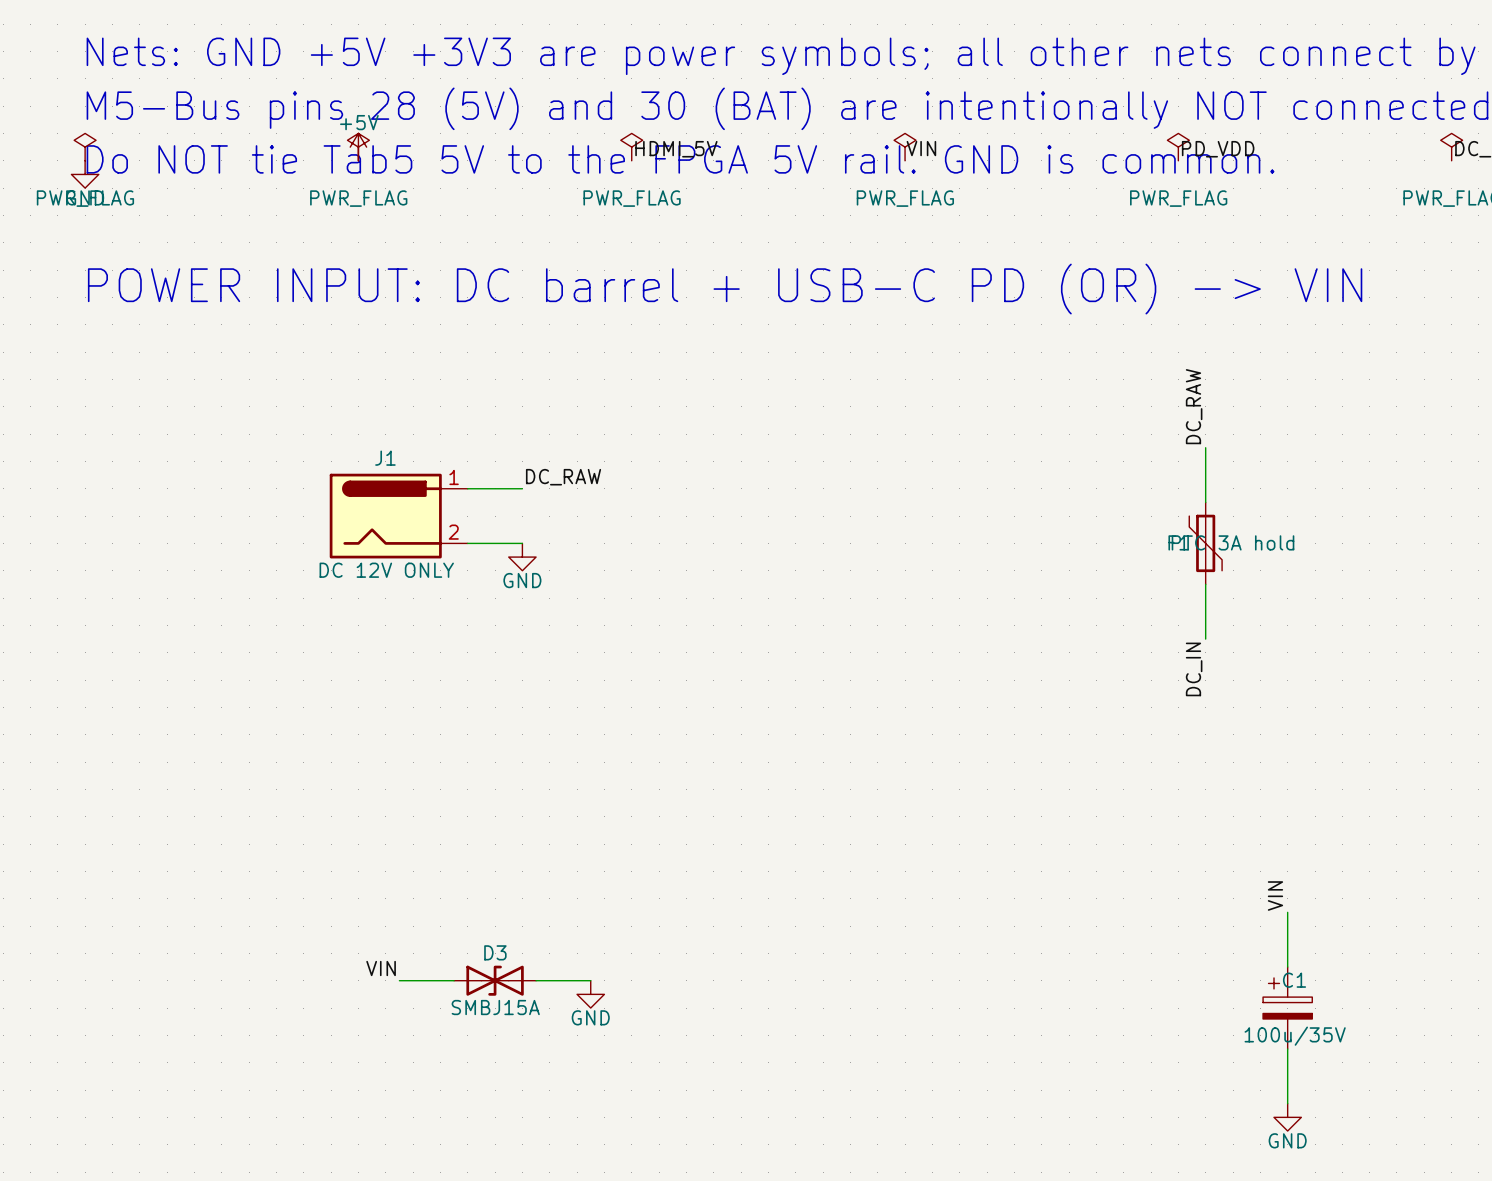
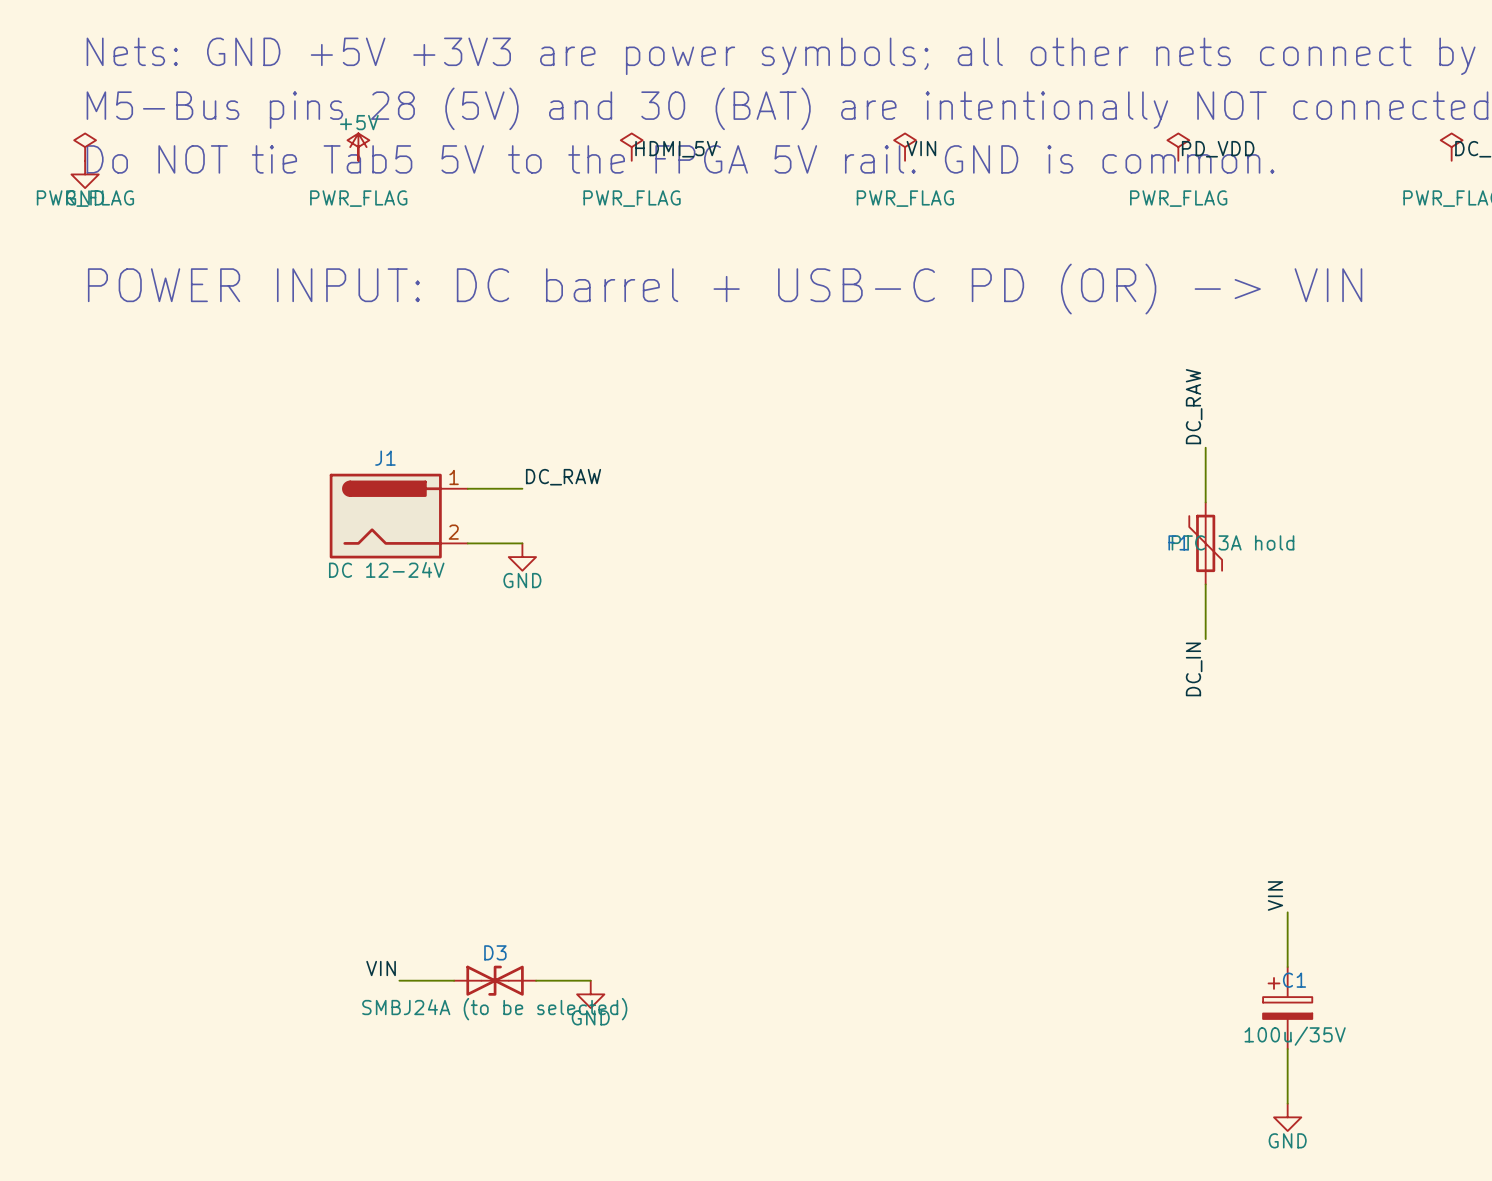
J1 value: DC 12V ONLY (386, 570) -> DC 12-24V (386, 569)
D3 value: SMBJ15A (495, 1007) -> SMBJ24A (to be selected) (494, 1009)

